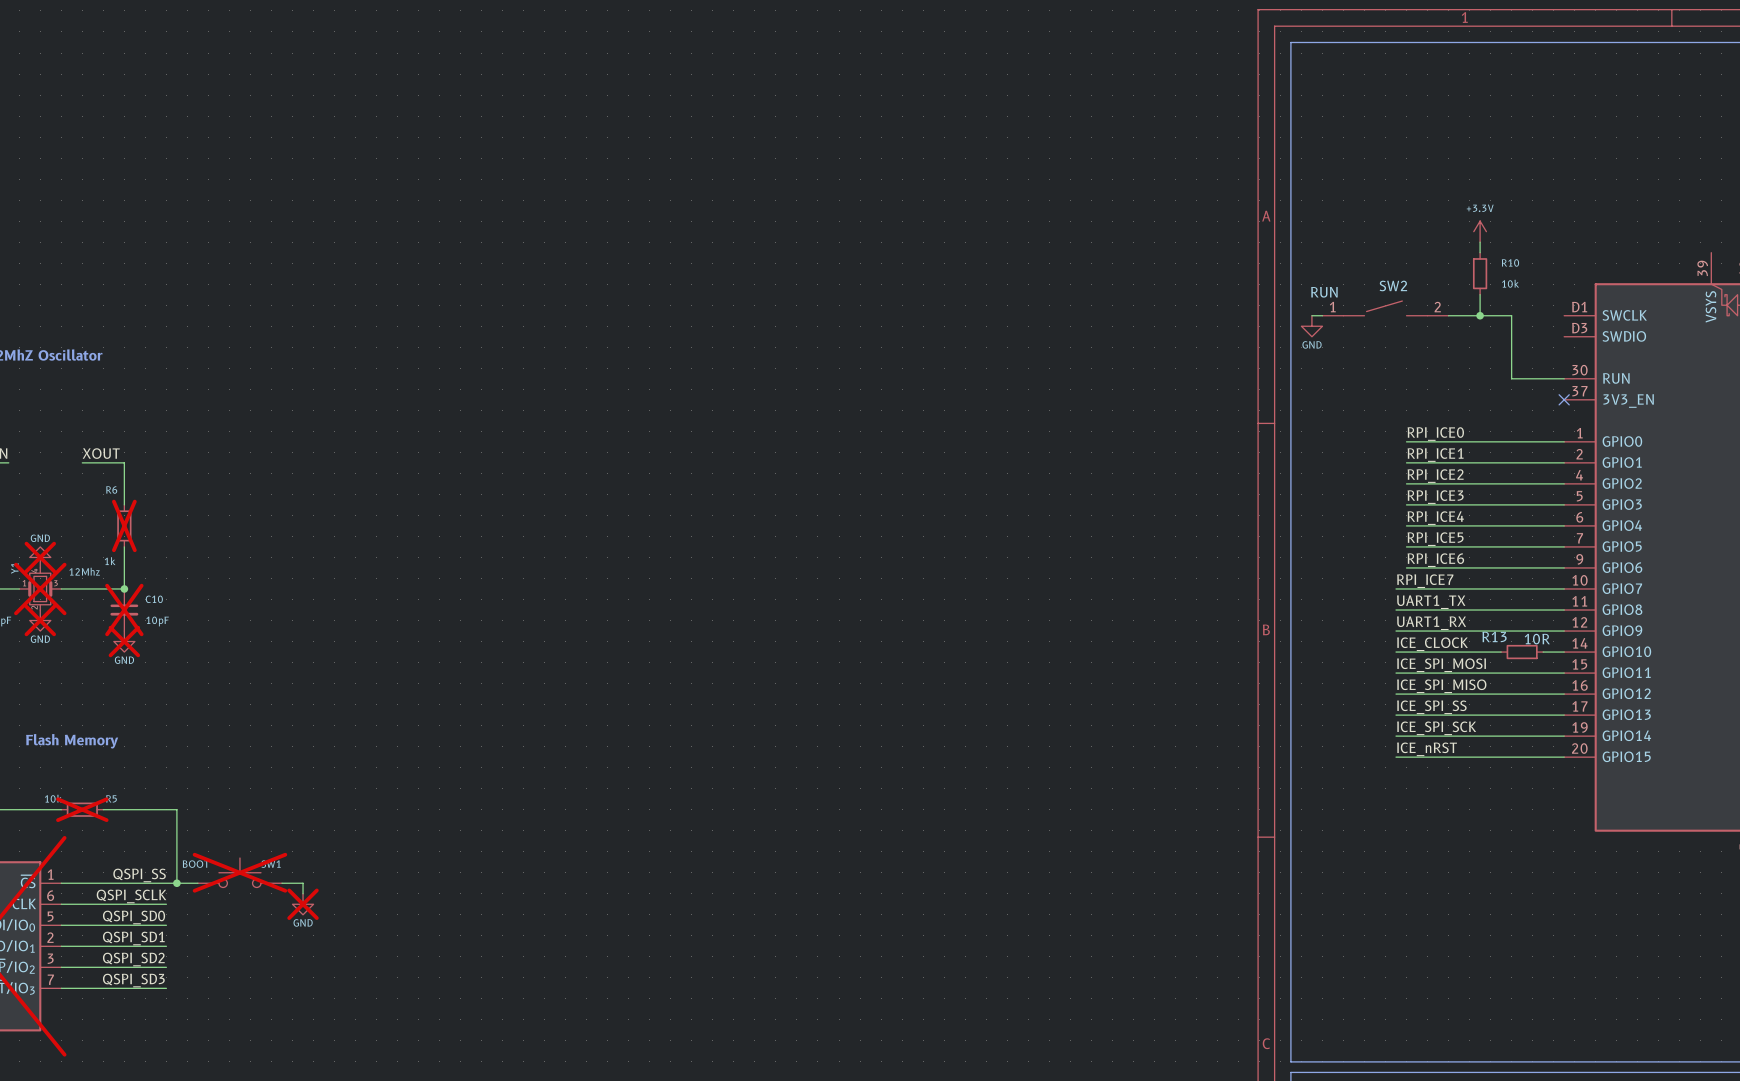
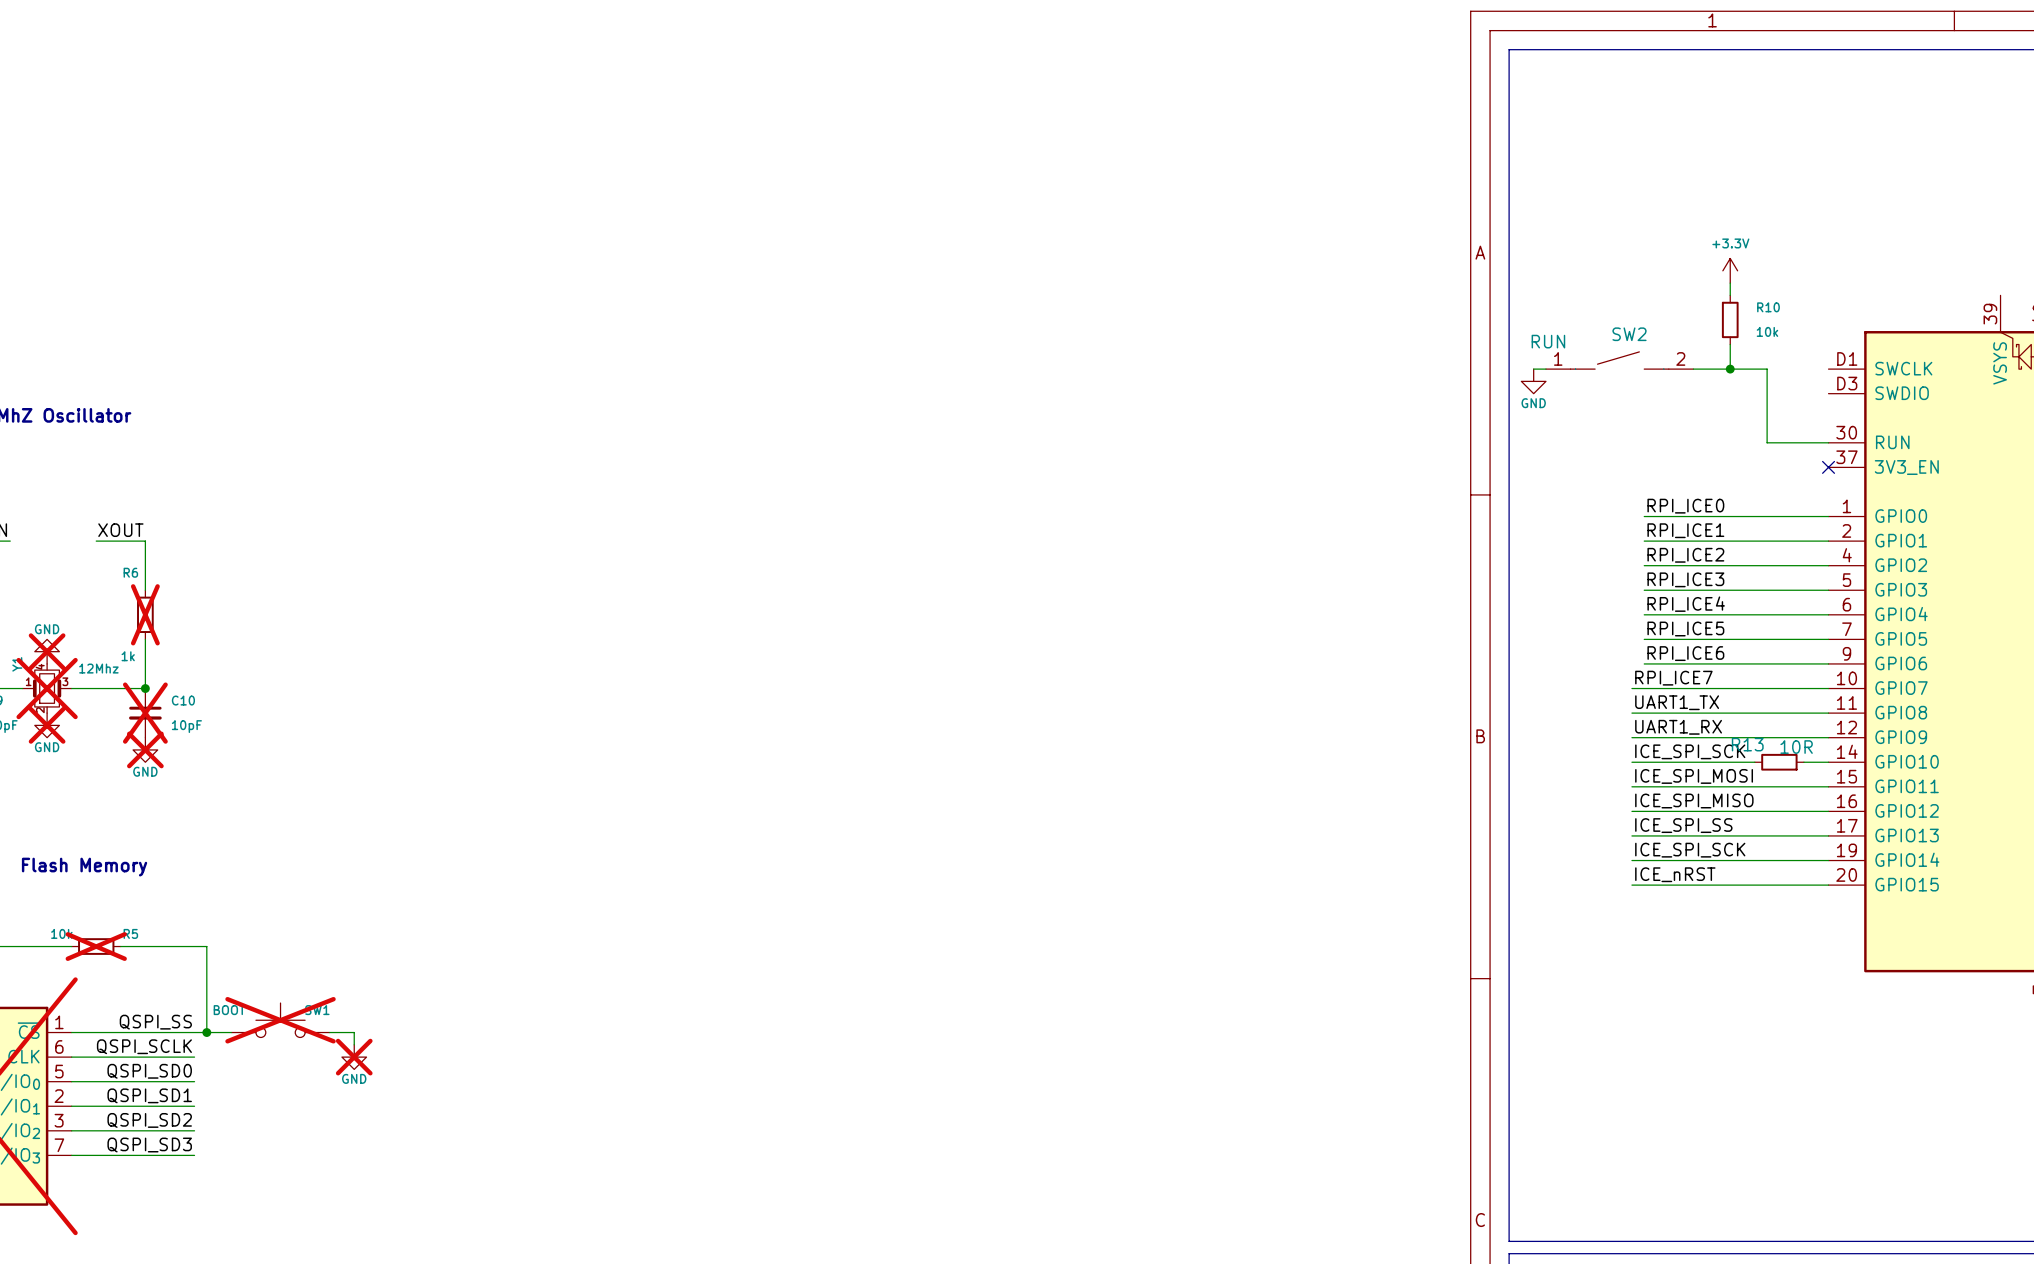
label: ICE_CLOCK (1432, 644) -> ICE_SPI_SCK (1690, 751)

